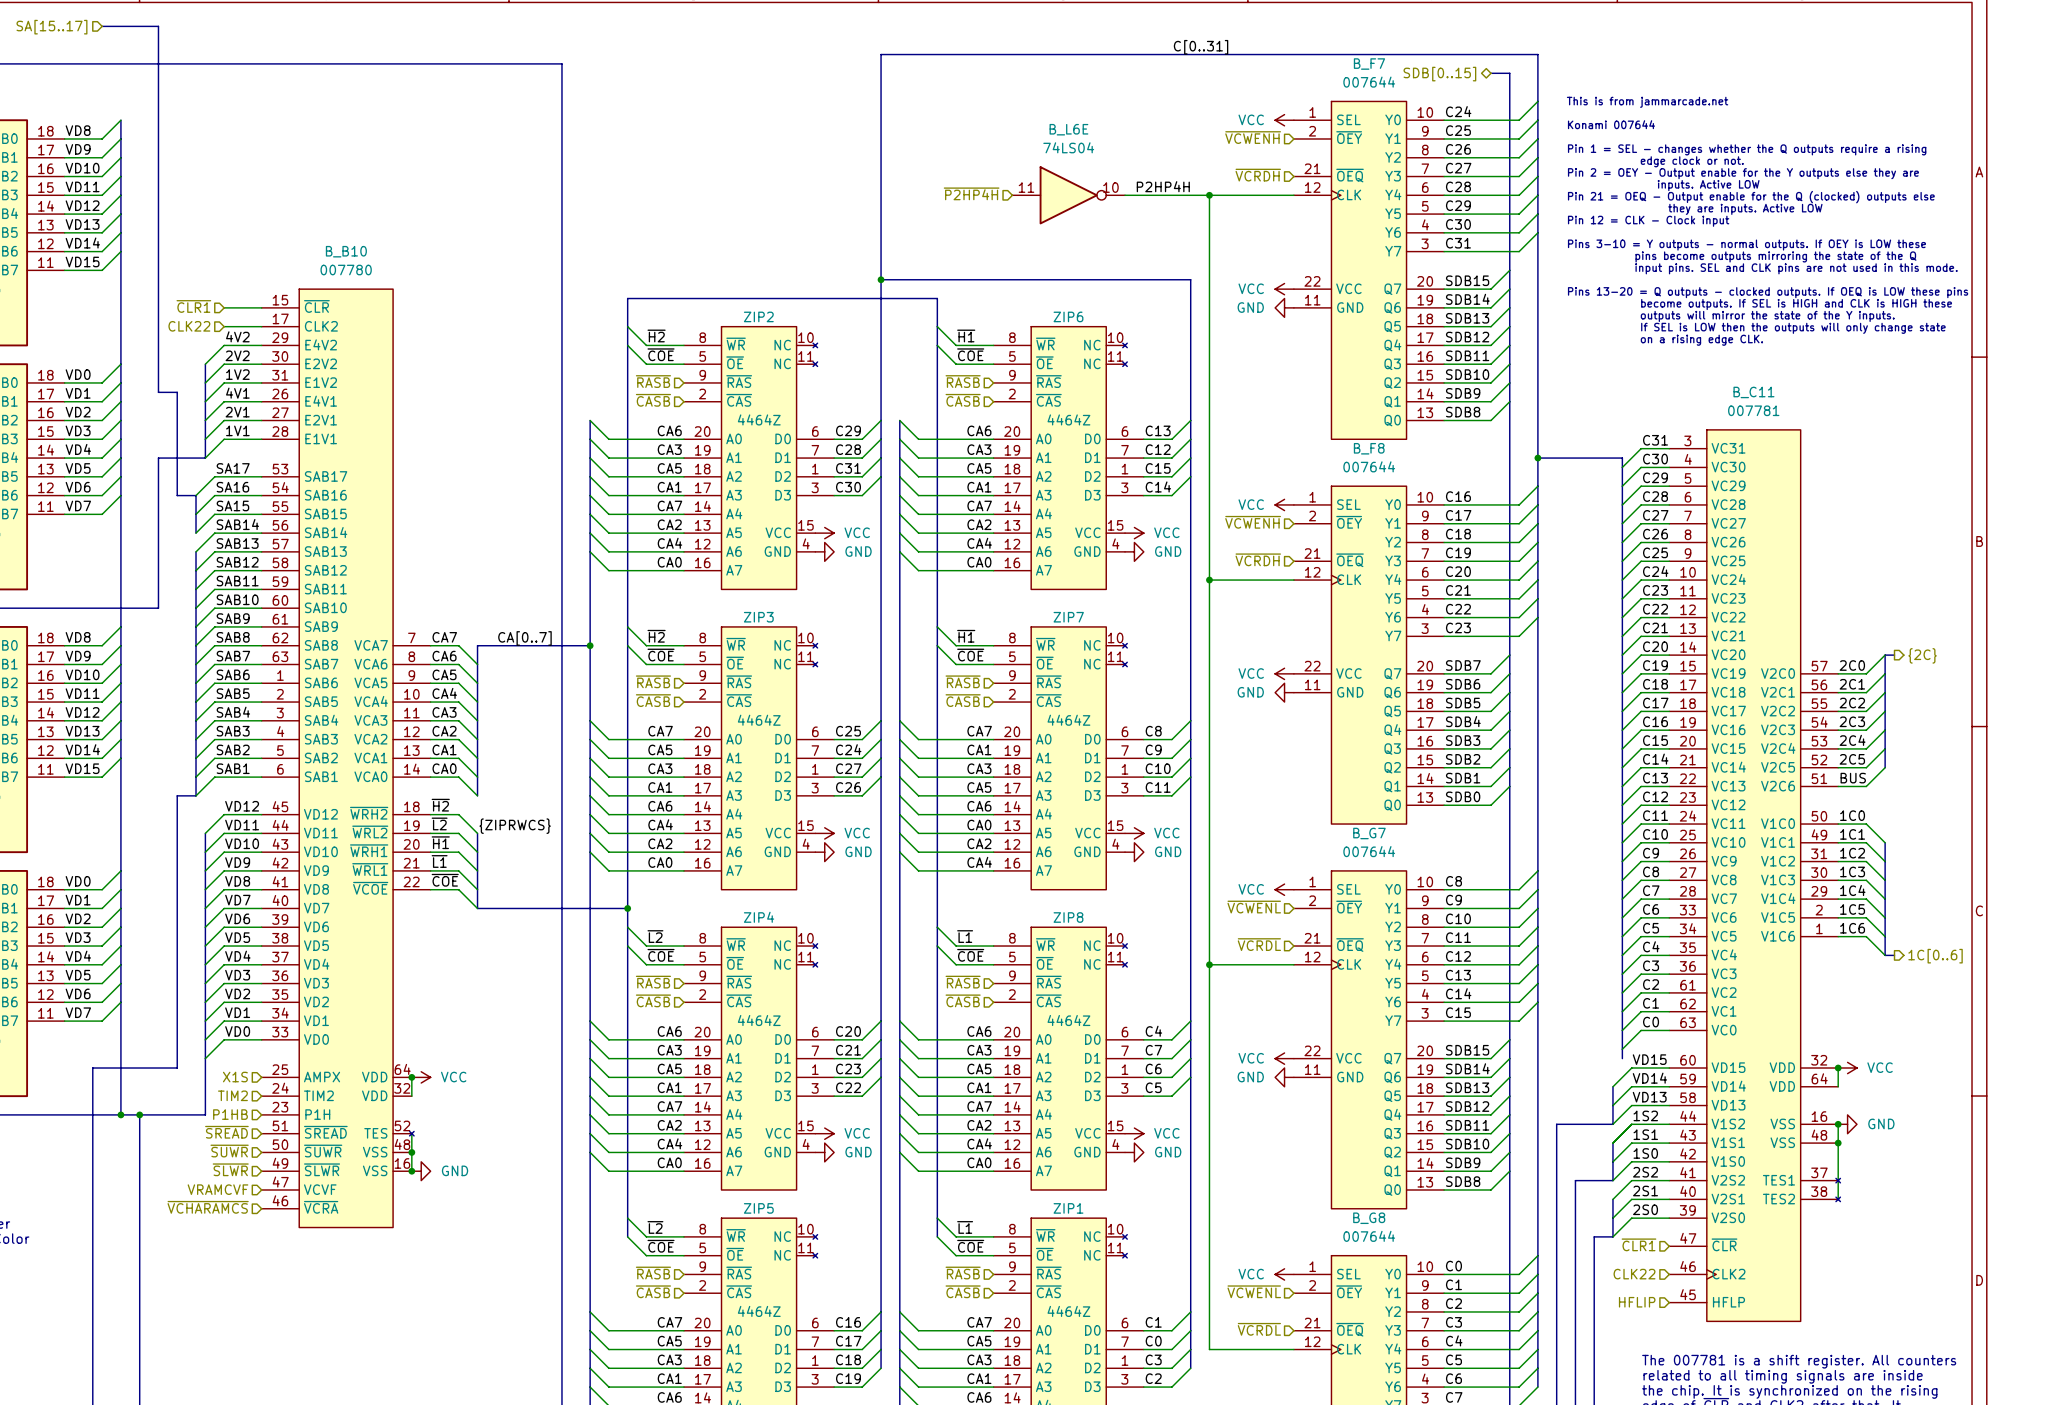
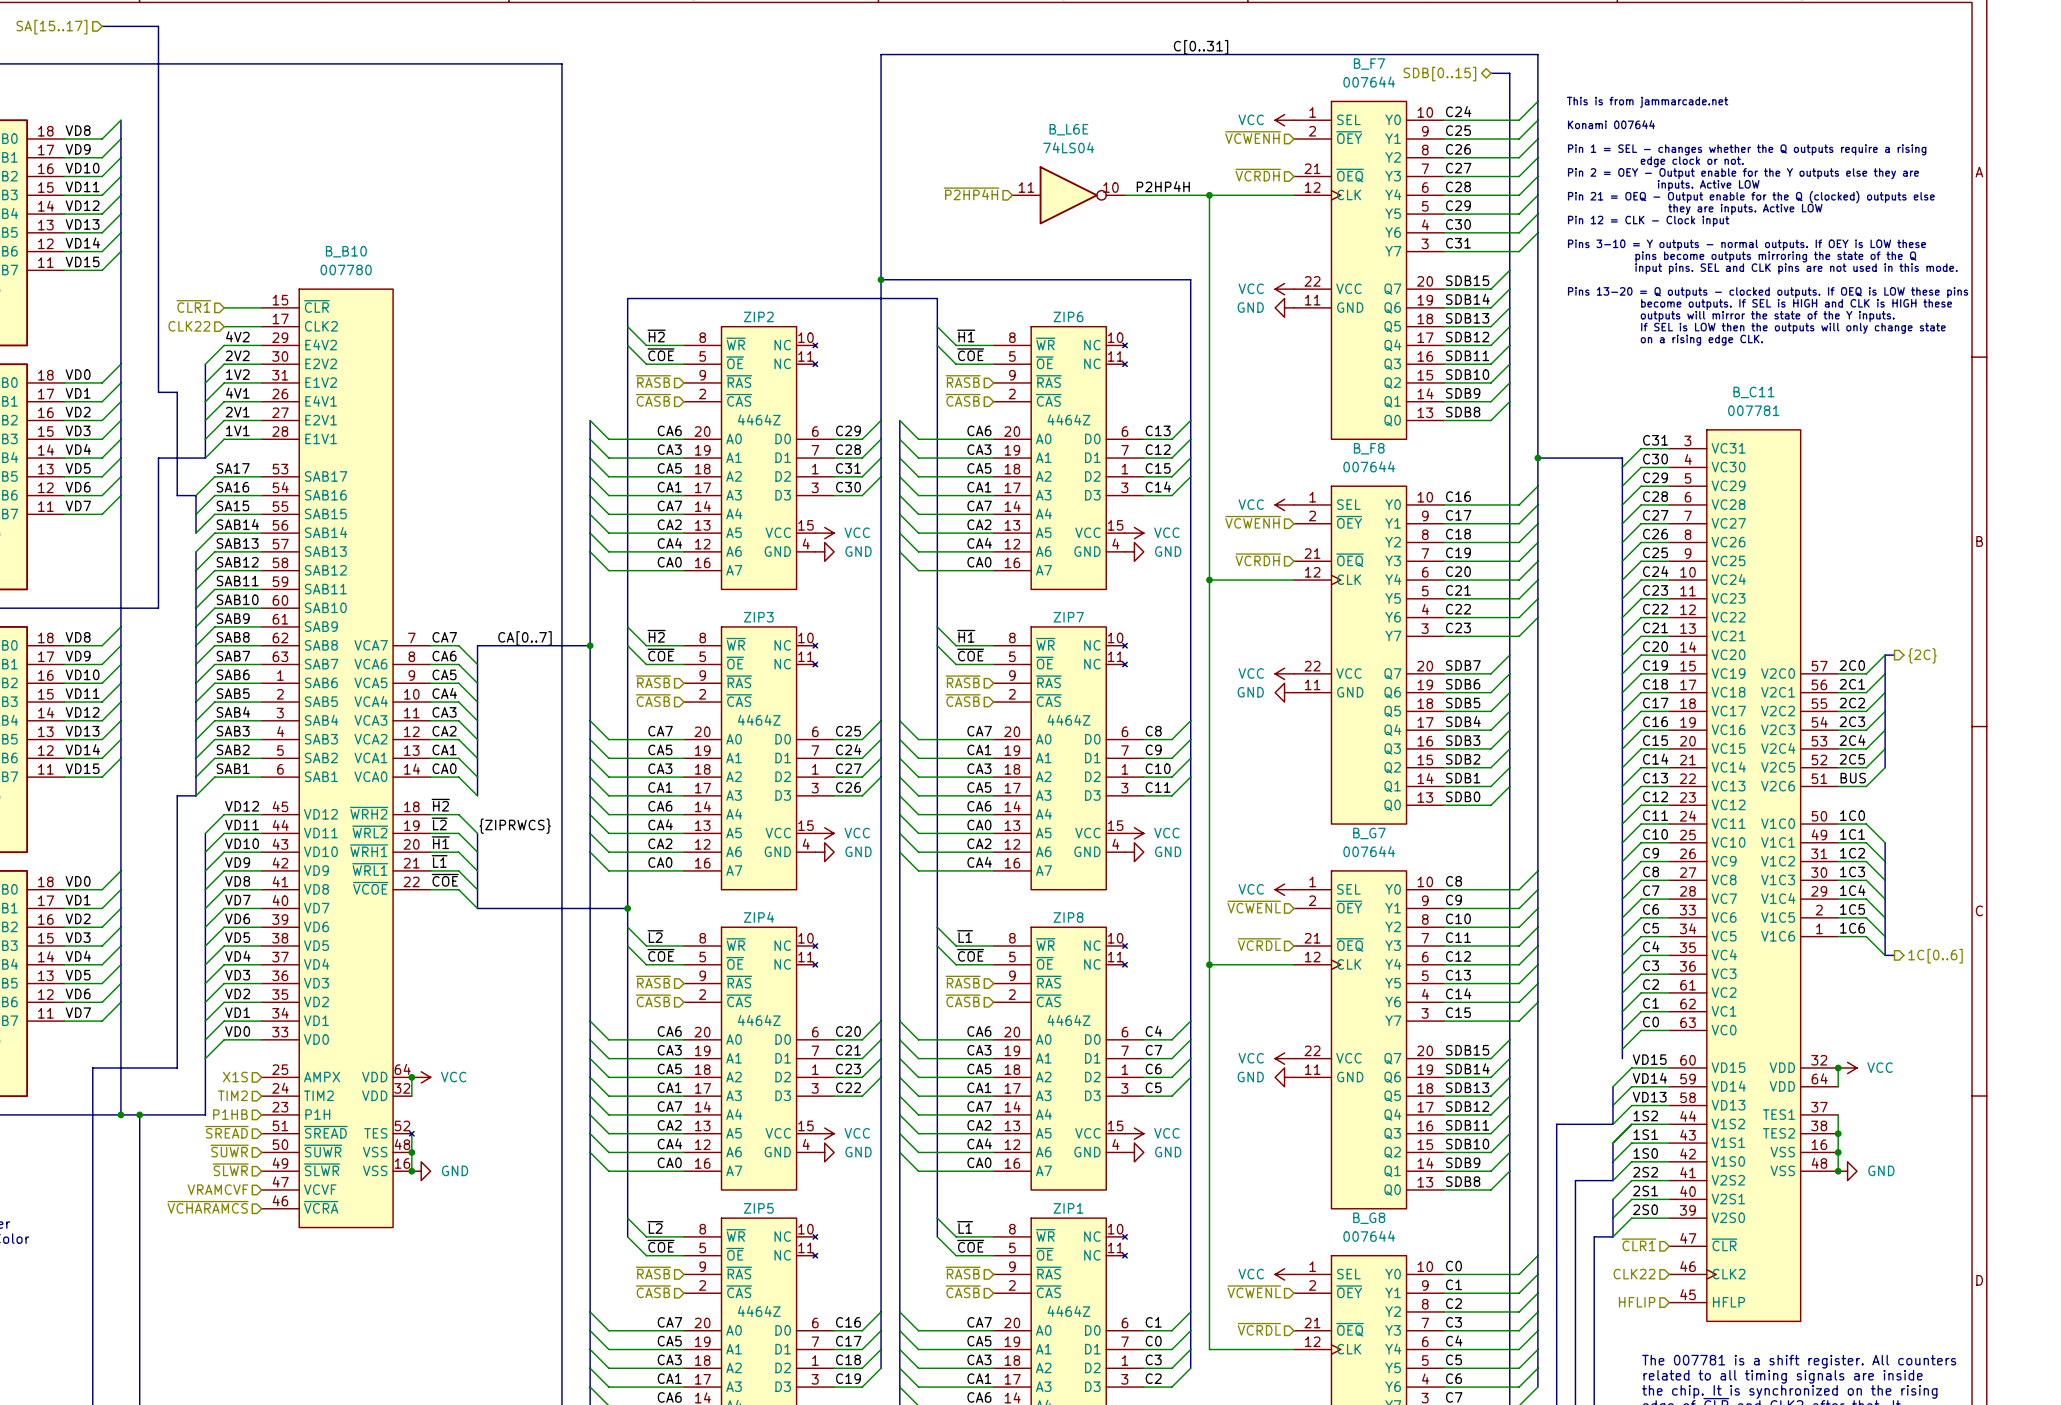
B_C11 symbol: [1669, 429, 1841, 1322] -> [1669, 429, 1839, 1322]
wire: none -> (1838, 1114) (1838, 1124)
junction: (1838, 1124) -> none
power symbol position: GND (1847, 1124) -> GND (1847, 1171)
junction: none -> (1838, 1133)
junction: (1838, 1143) -> none
junction: none -> (1838, 1152)
wire: (1838, 1171) (1838, 1199) -> none
junction: none -> (1838, 1171)

